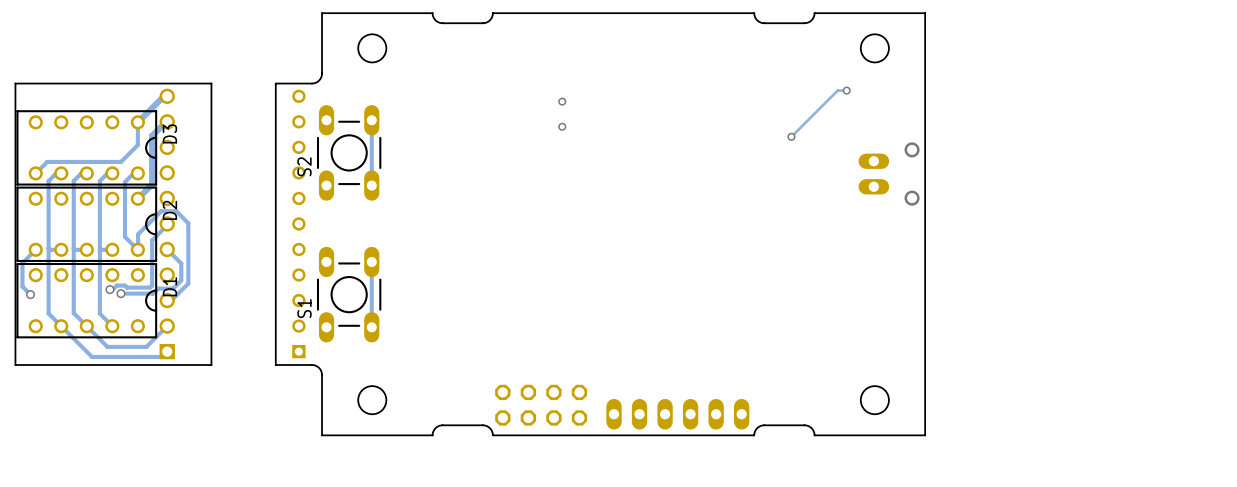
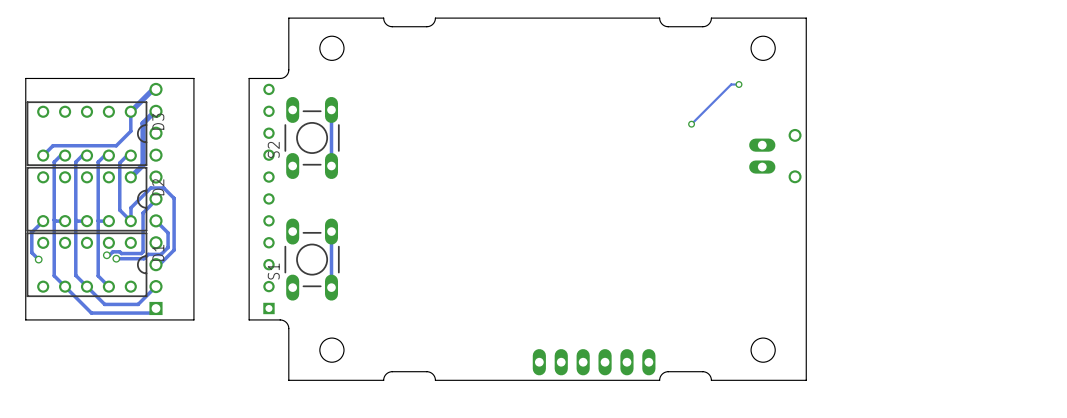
via: (562, 101) -> none
via: (562, 126) -> none
part: (541, 405) -> none

